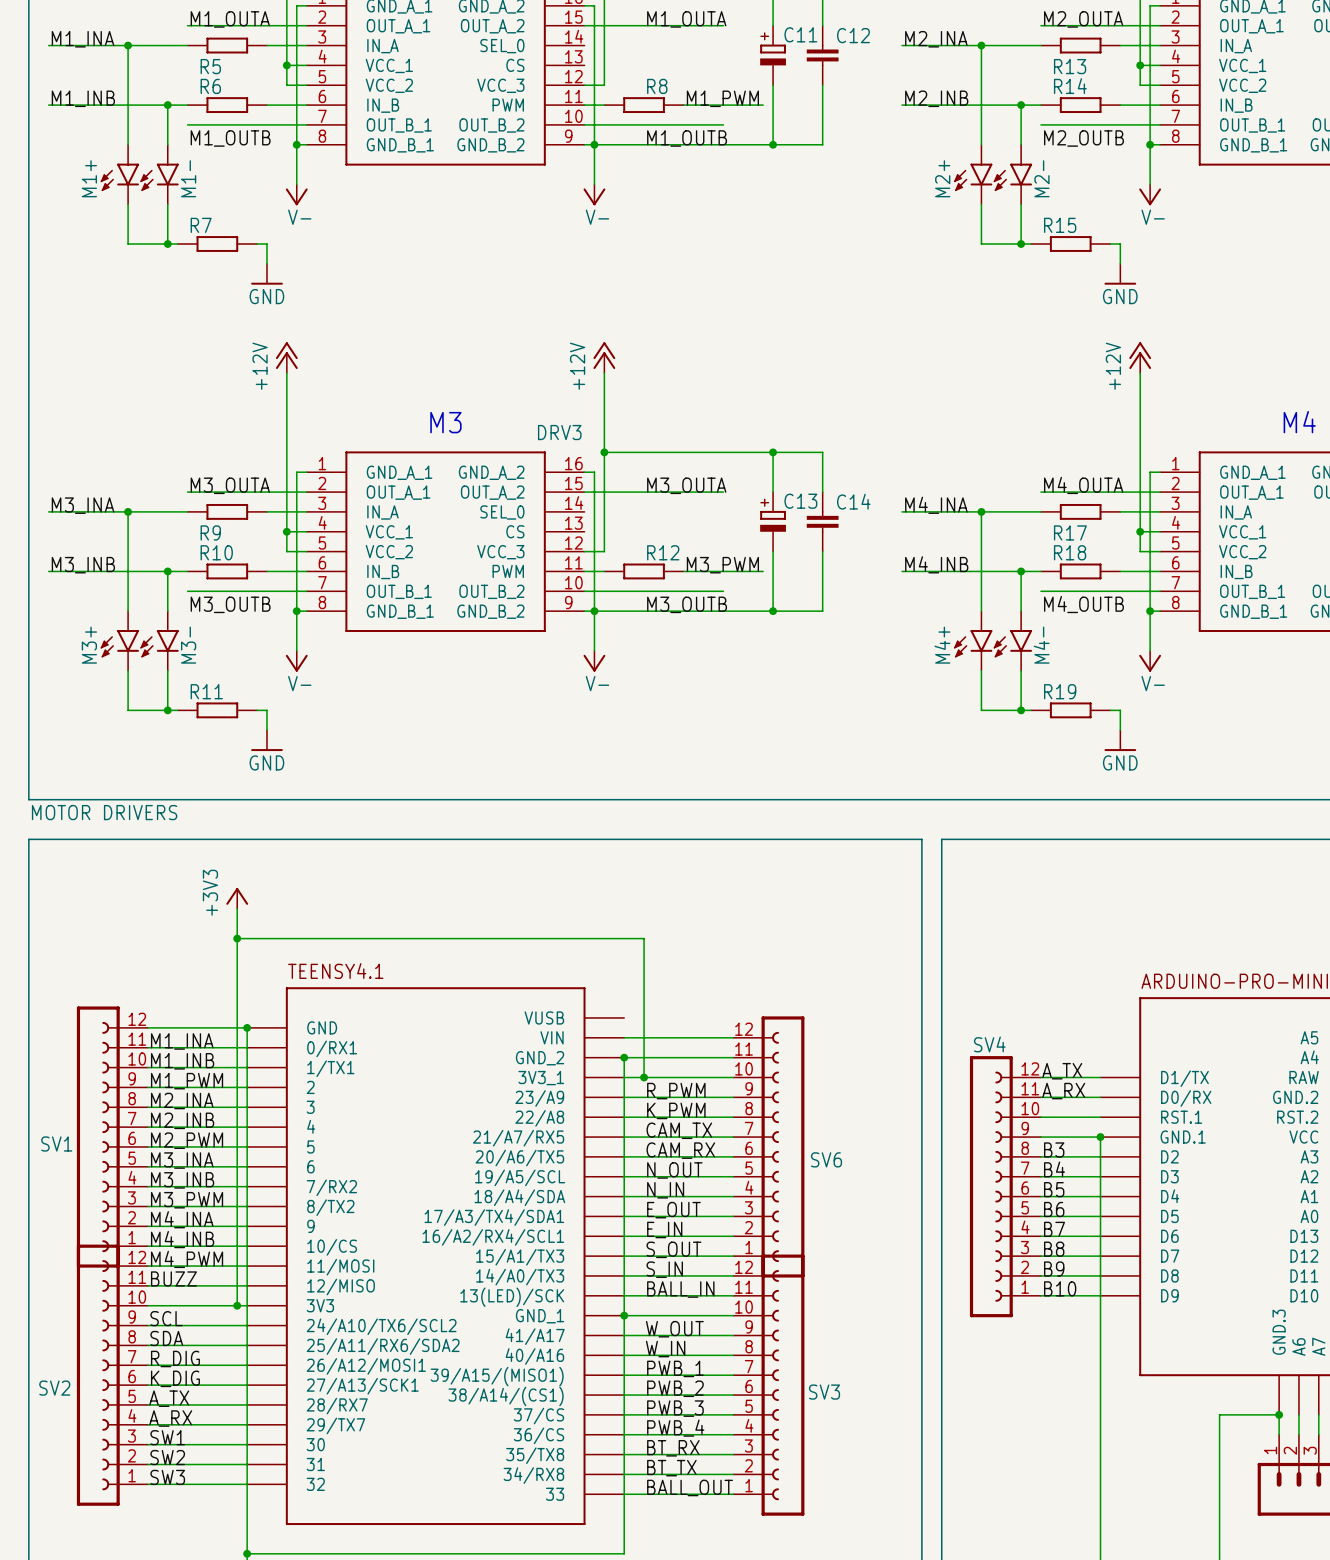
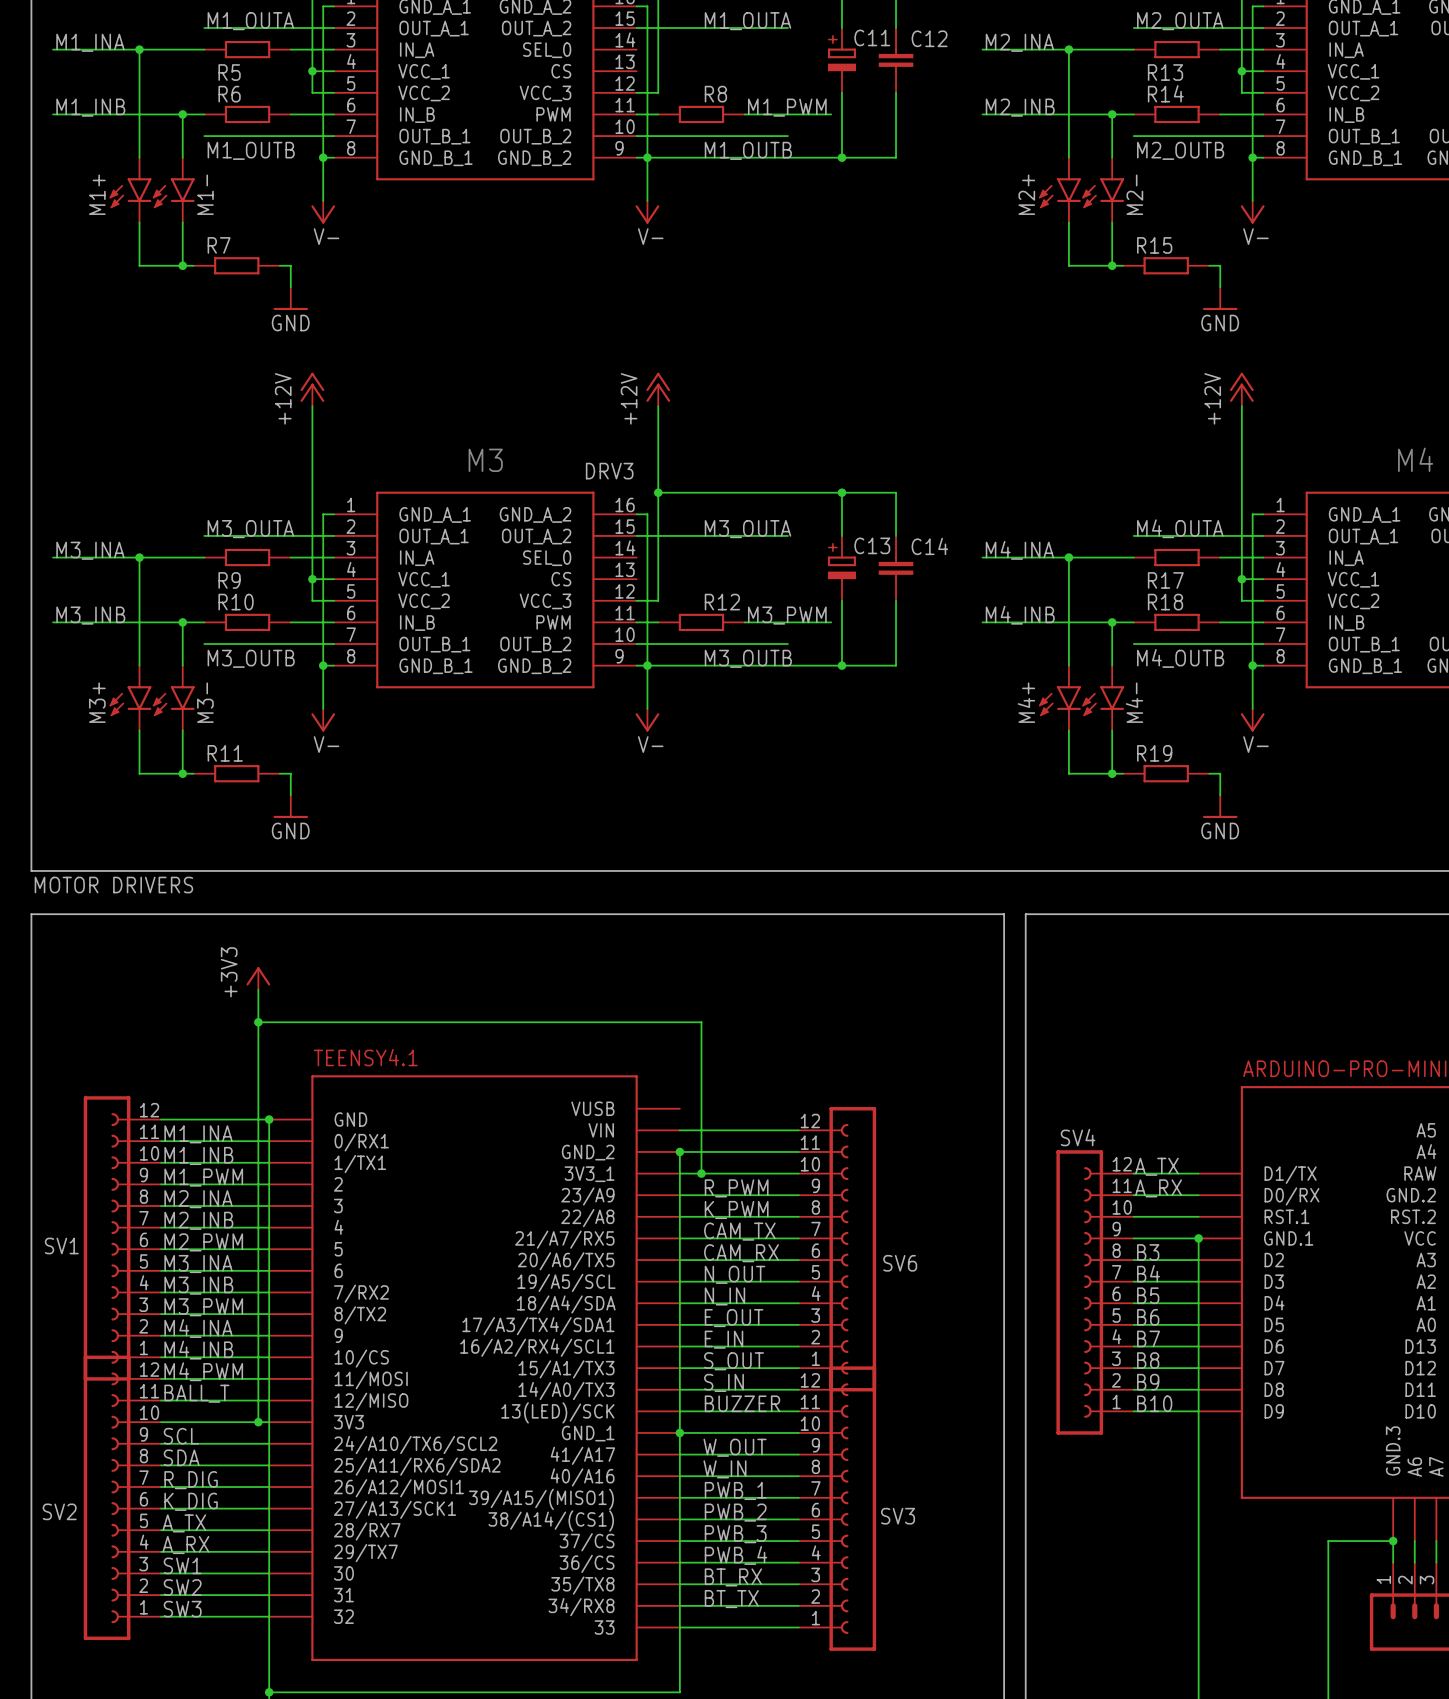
label: BUZZ (173, 1278) -> BALL_T (196, 1393)
label: BALL_IN (680, 1289) -> BUZZER (742, 1403)
label: BALL_OUT (690, 1487) -> none

